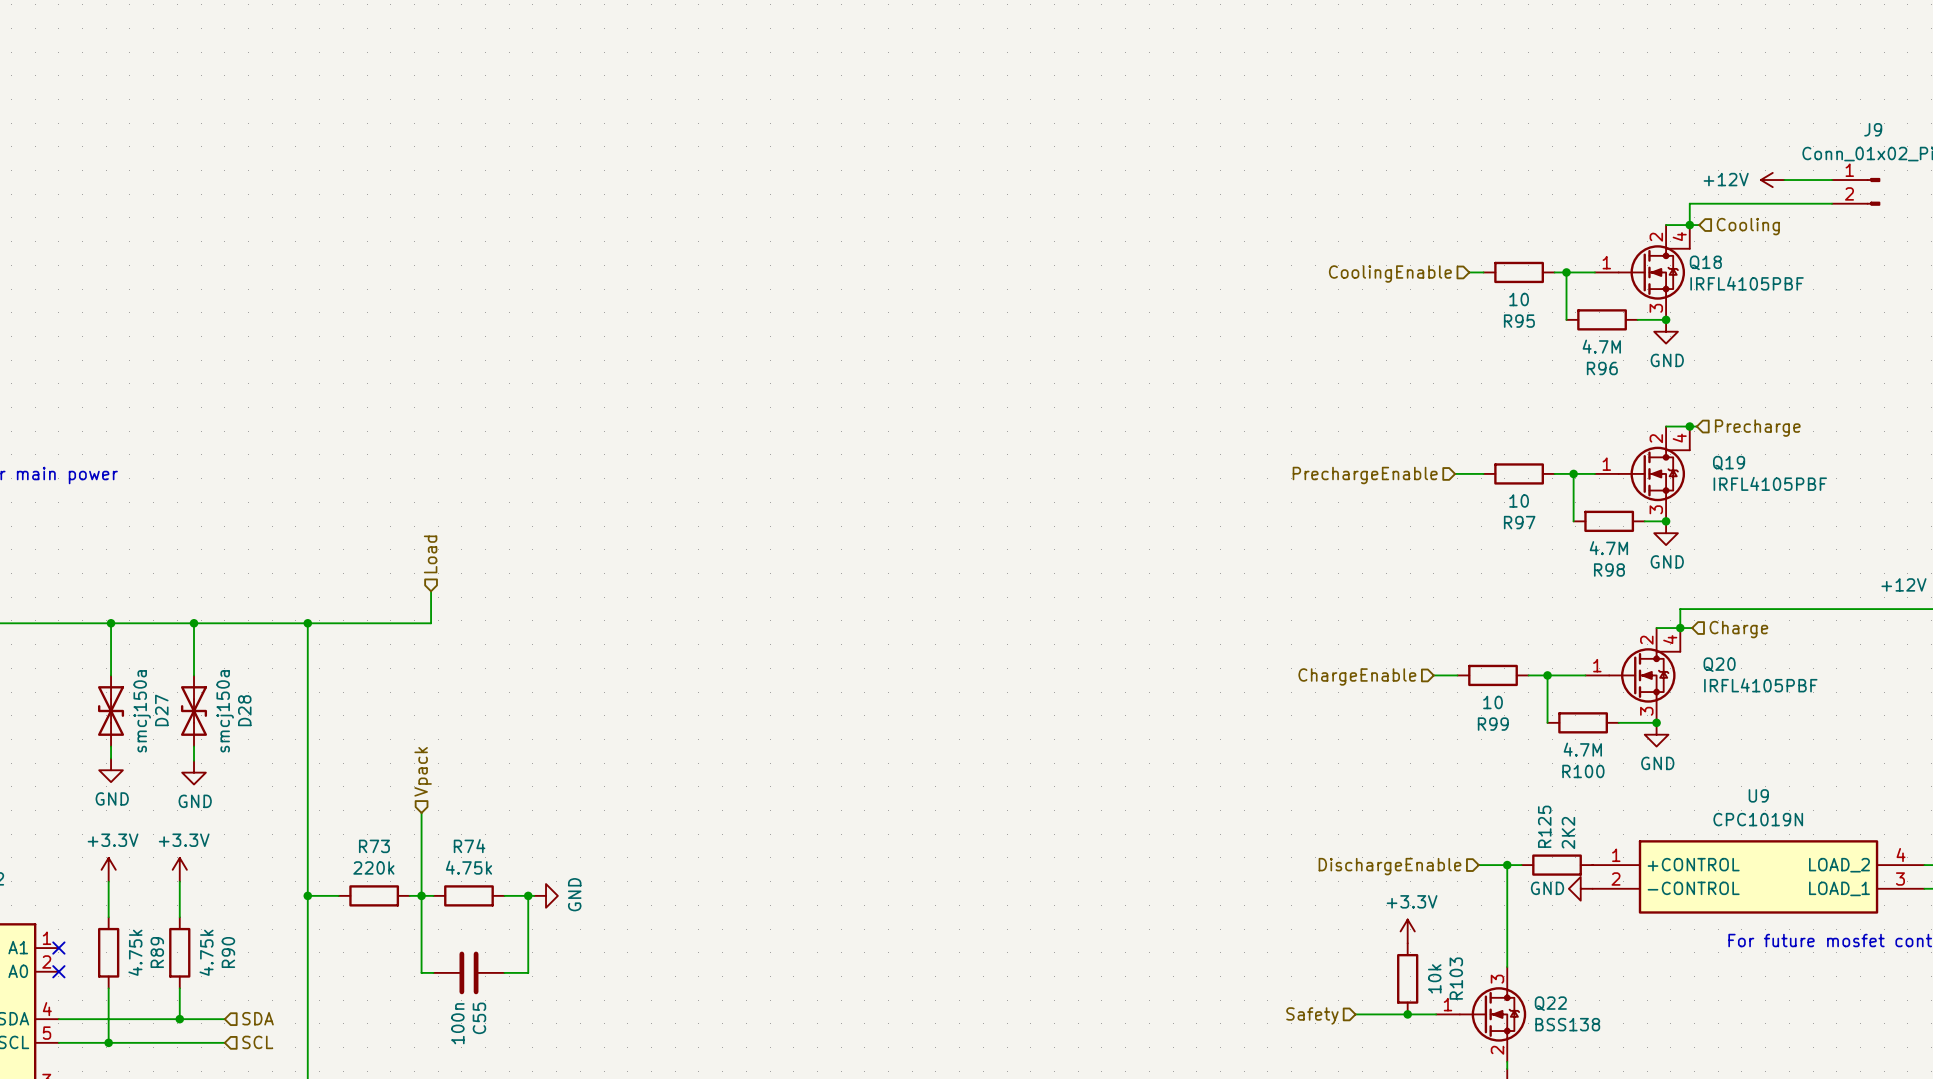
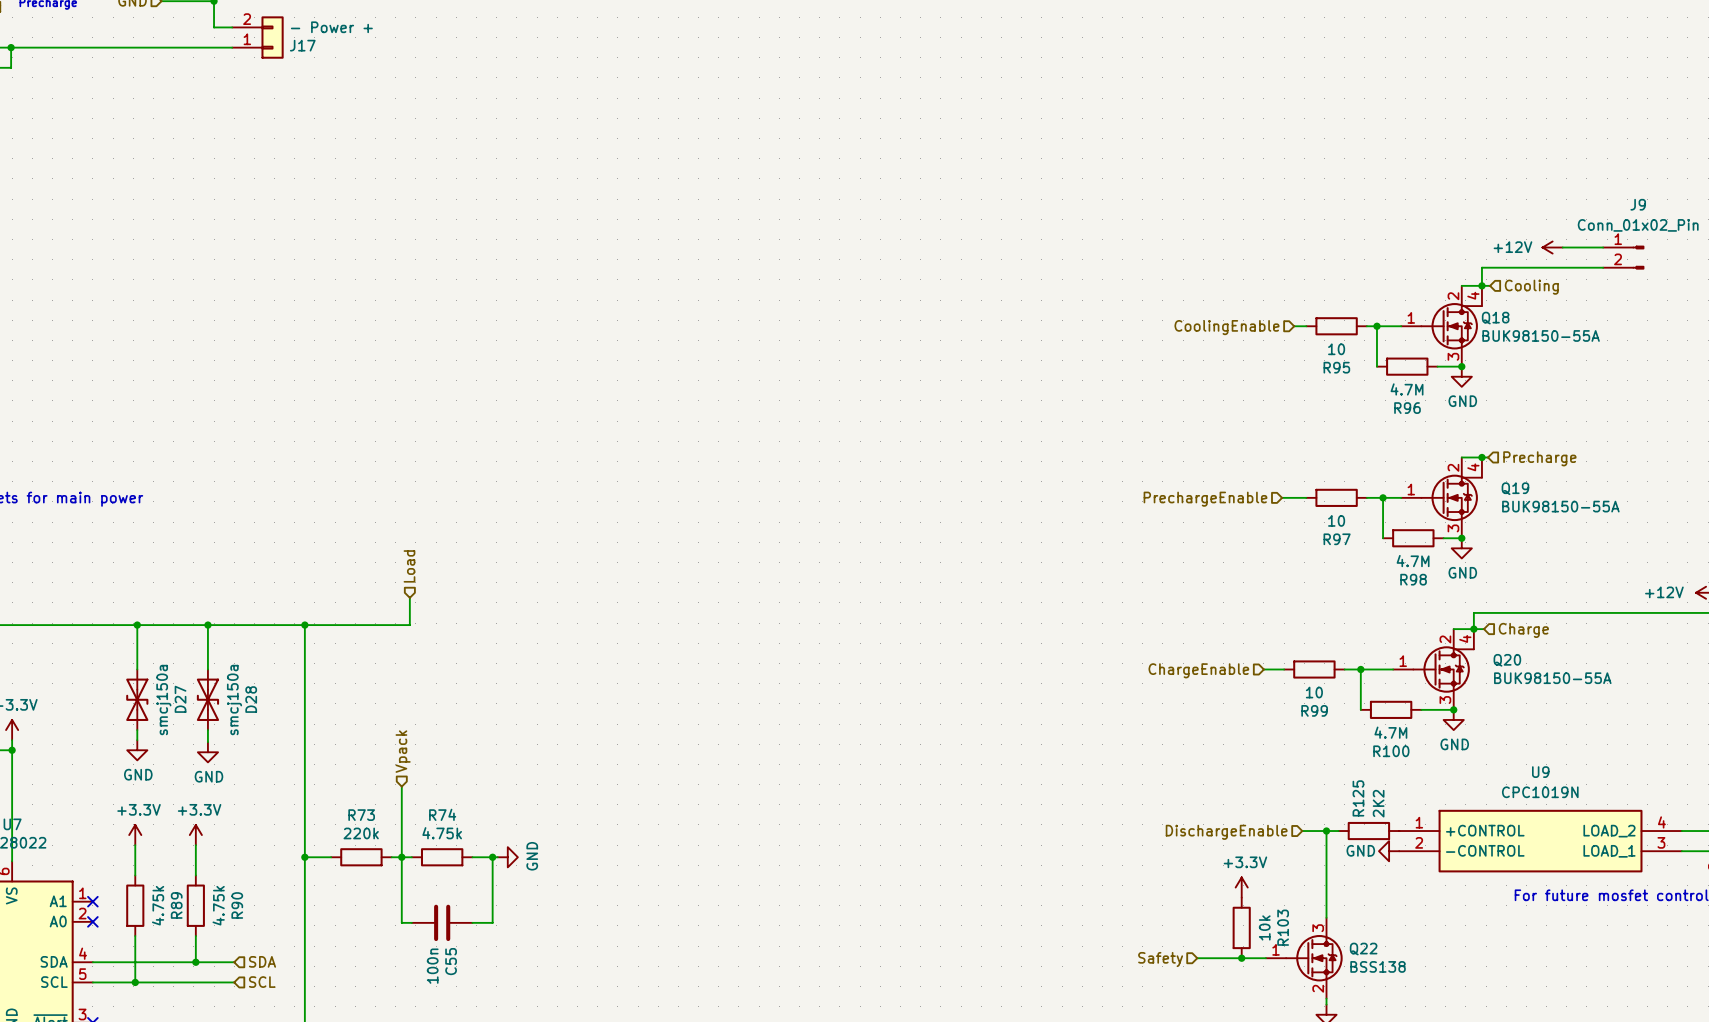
Q18 value: IRFL4105PBF (1747, 283) -> BUK98150-55A (1541, 335)
Q19 value: IRFL4105PBF (1770, 483) -> BUK98150-55A (1560, 506)
Q20 value: IRFL4105PBF (1760, 685) -> BUK98150-55A (1552, 678)

